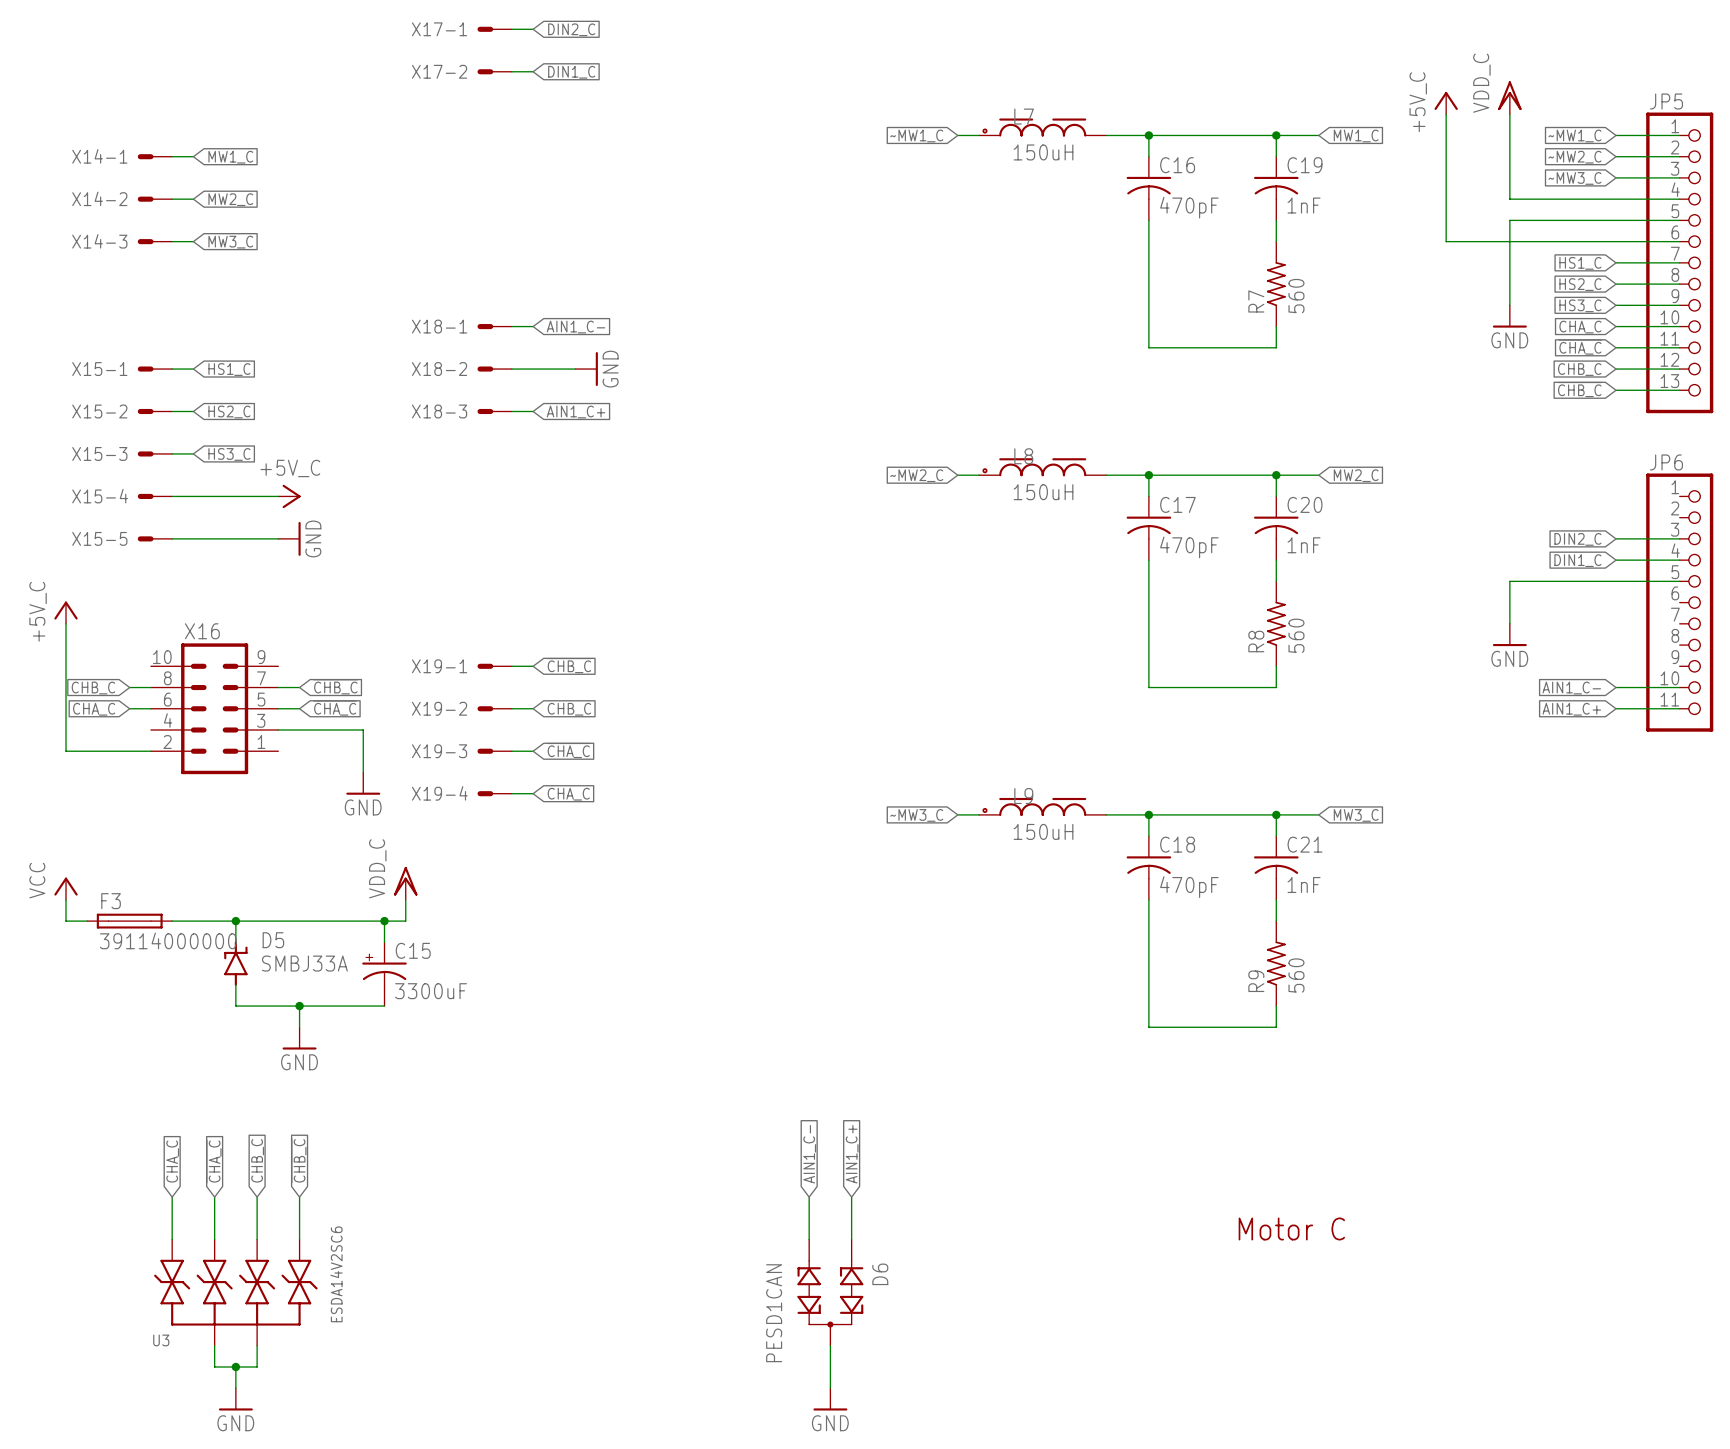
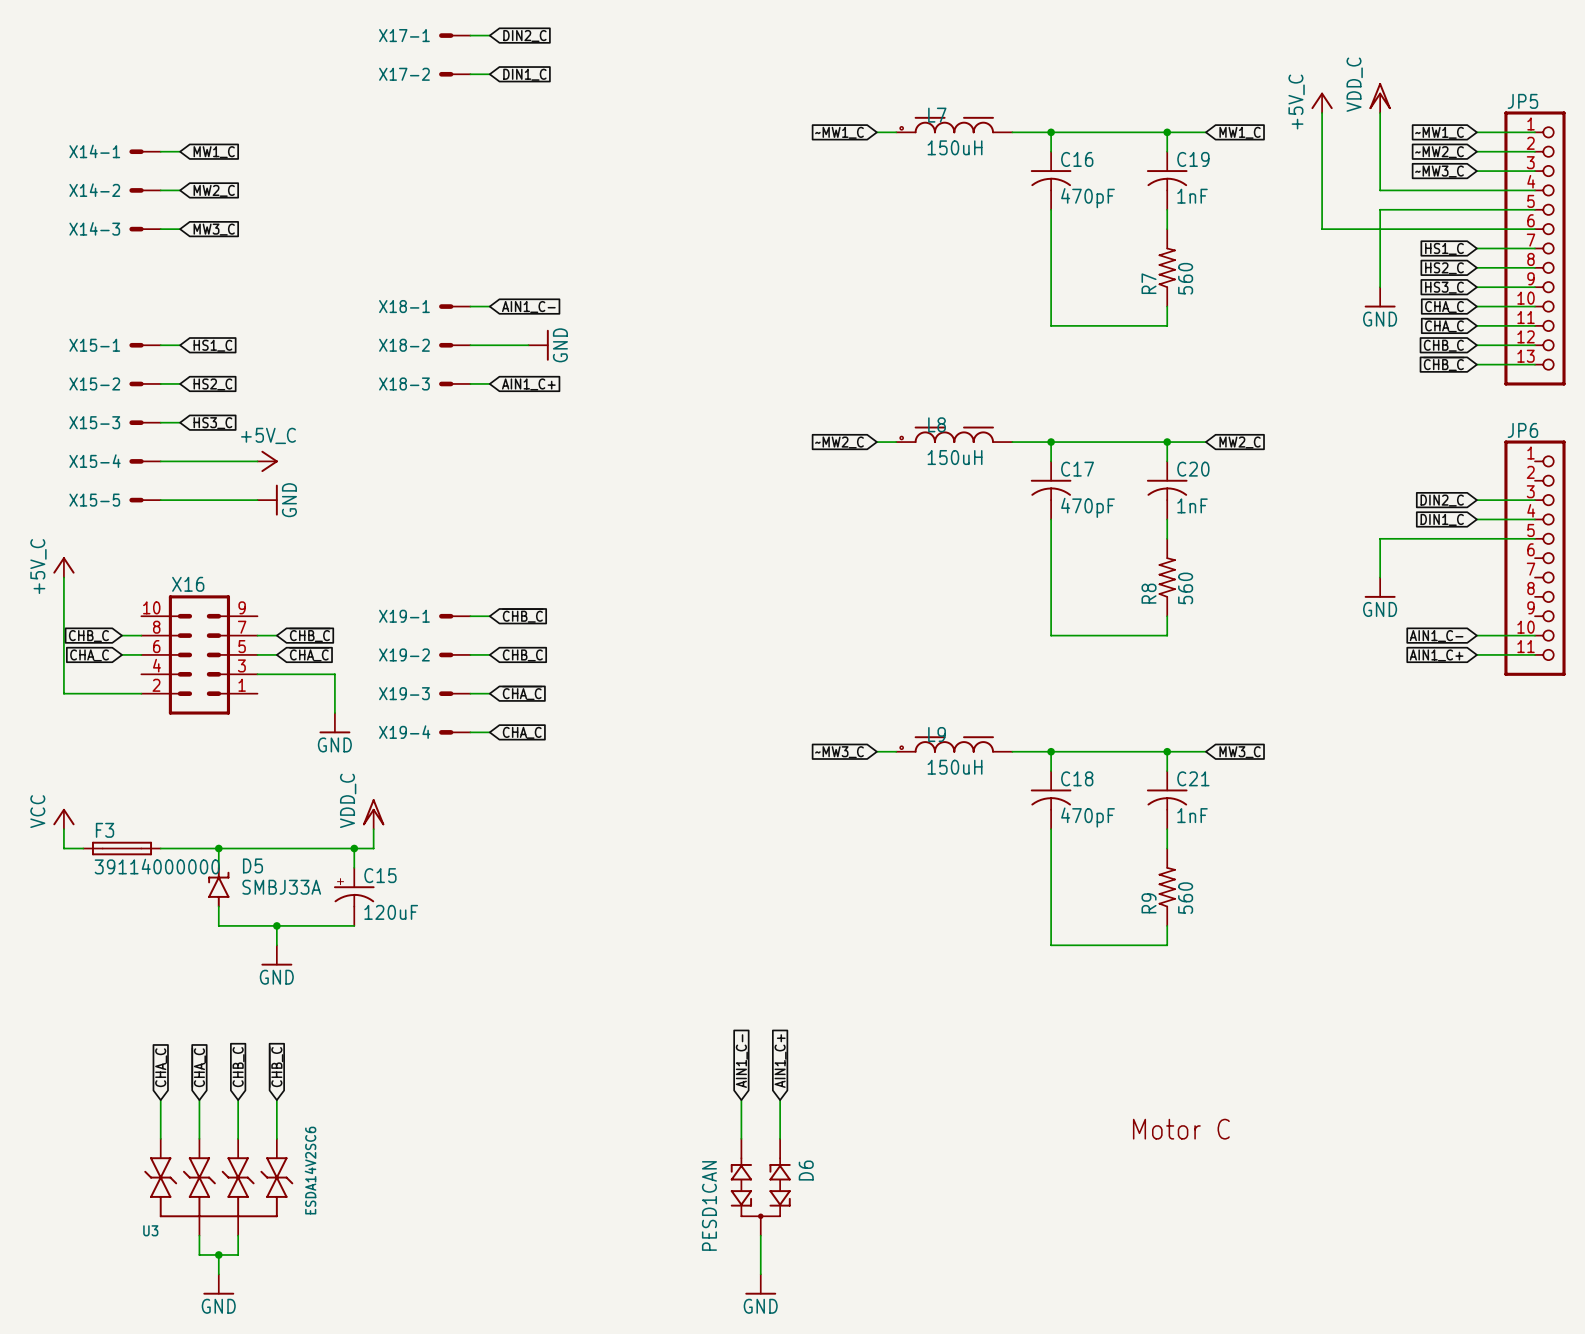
C15 value: 3300uF (431, 991) -> 120uF (391, 912)

